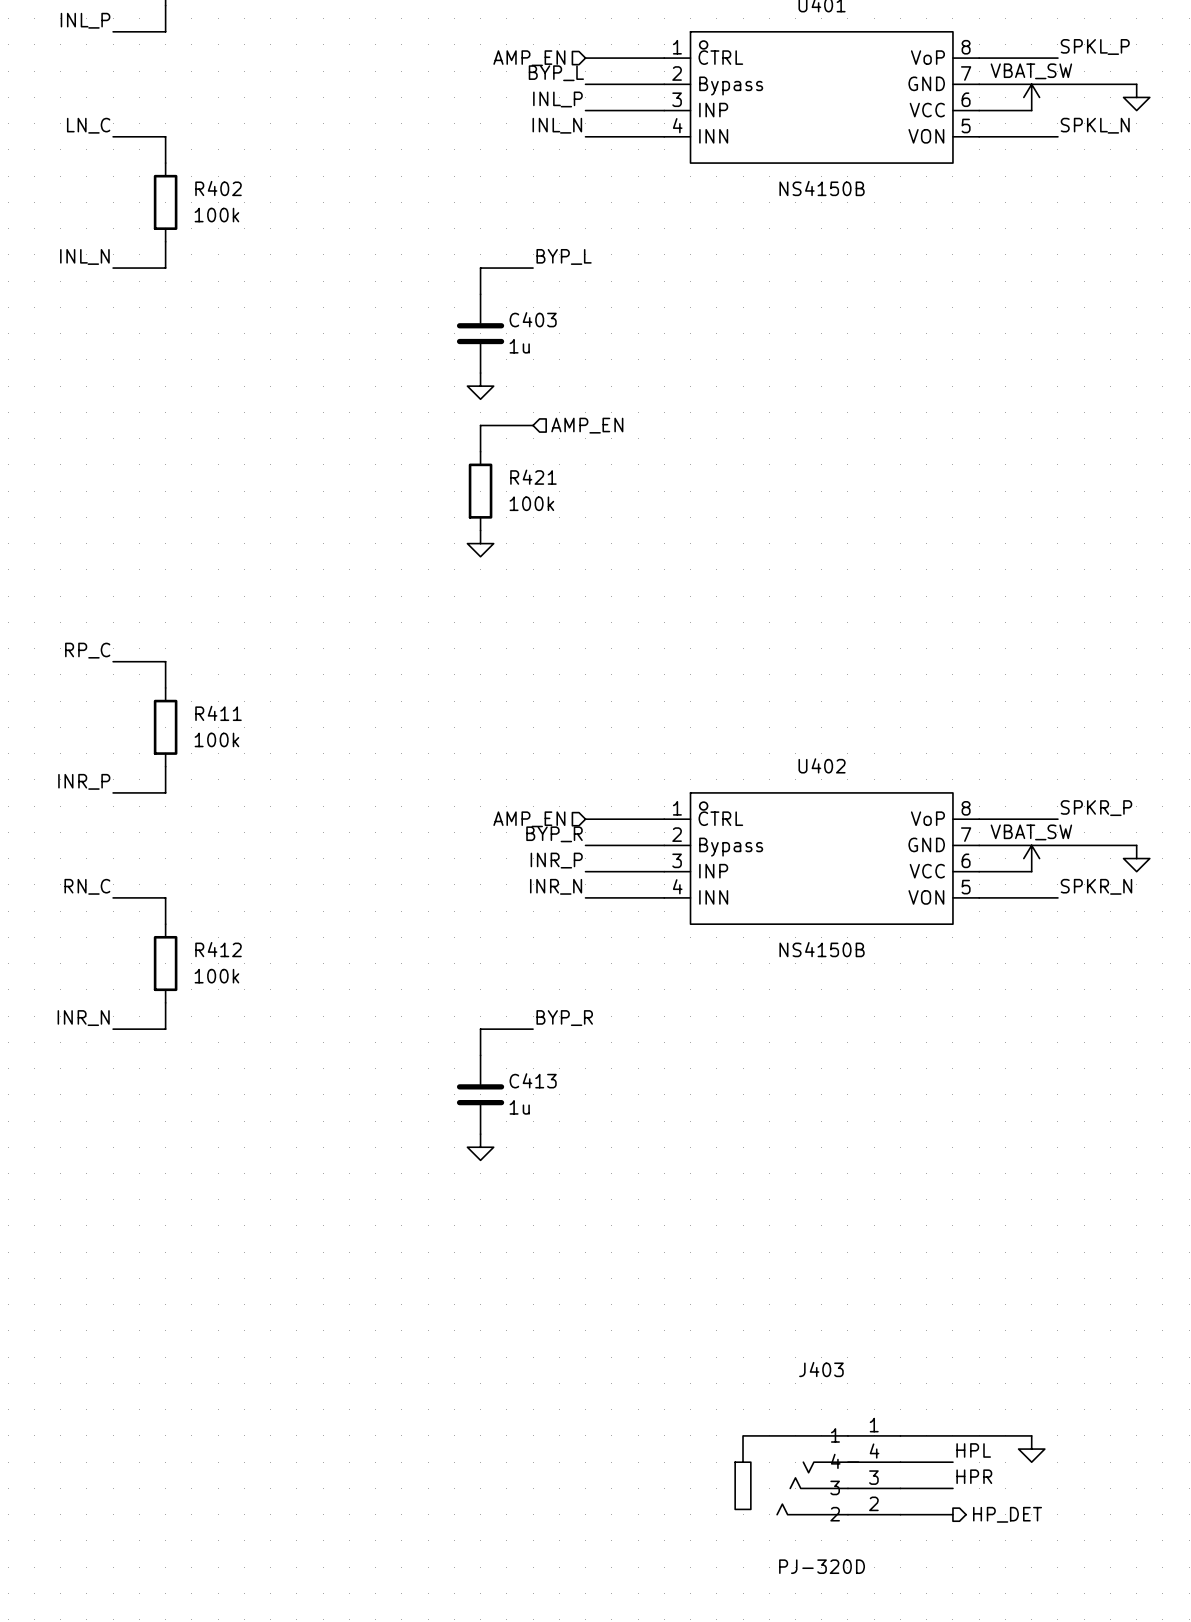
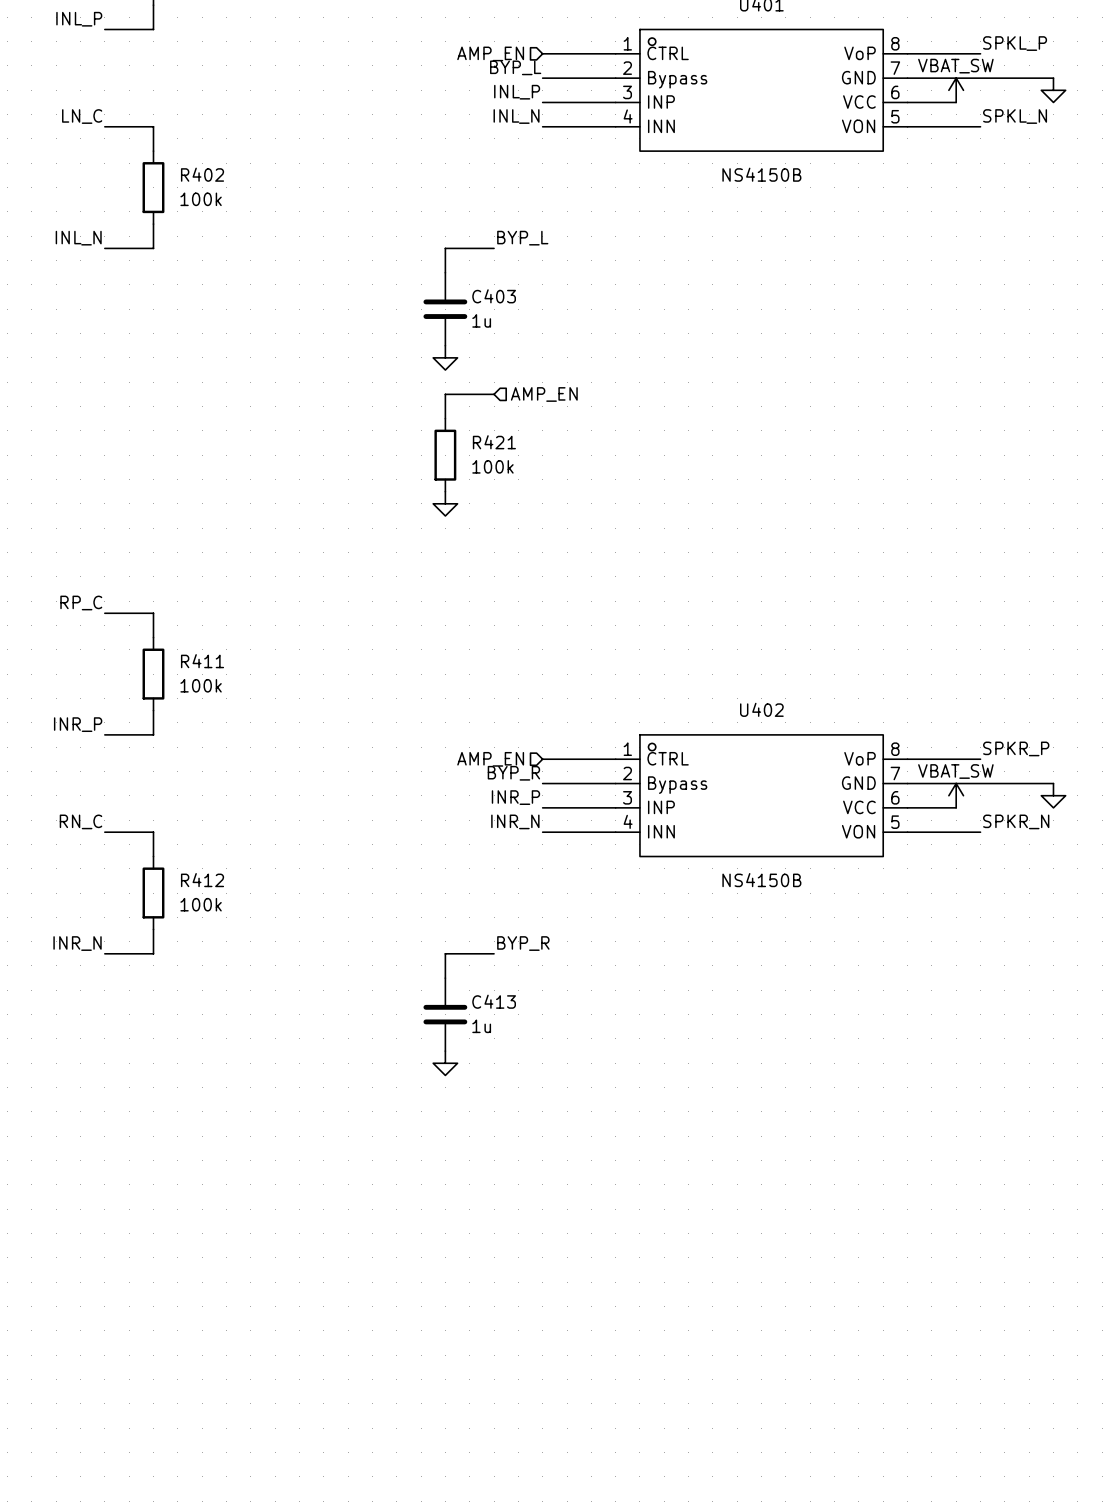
wire: (900, 1435) (1031, 1435) -> none
power symbol: (1031, 1449) -> none
label: HPL (973, 1450) -> none
wire: (900, 1462) (952, 1462) -> none
J403: PJ-320D (817, 1475) -> none
label: HPR (974, 1476) -> none
wire: (900, 1488) (952, 1488) -> none
wire: (900, 1514) (952, 1514) -> none
hierarchical label: HP_DET (1007, 1514) -> none

